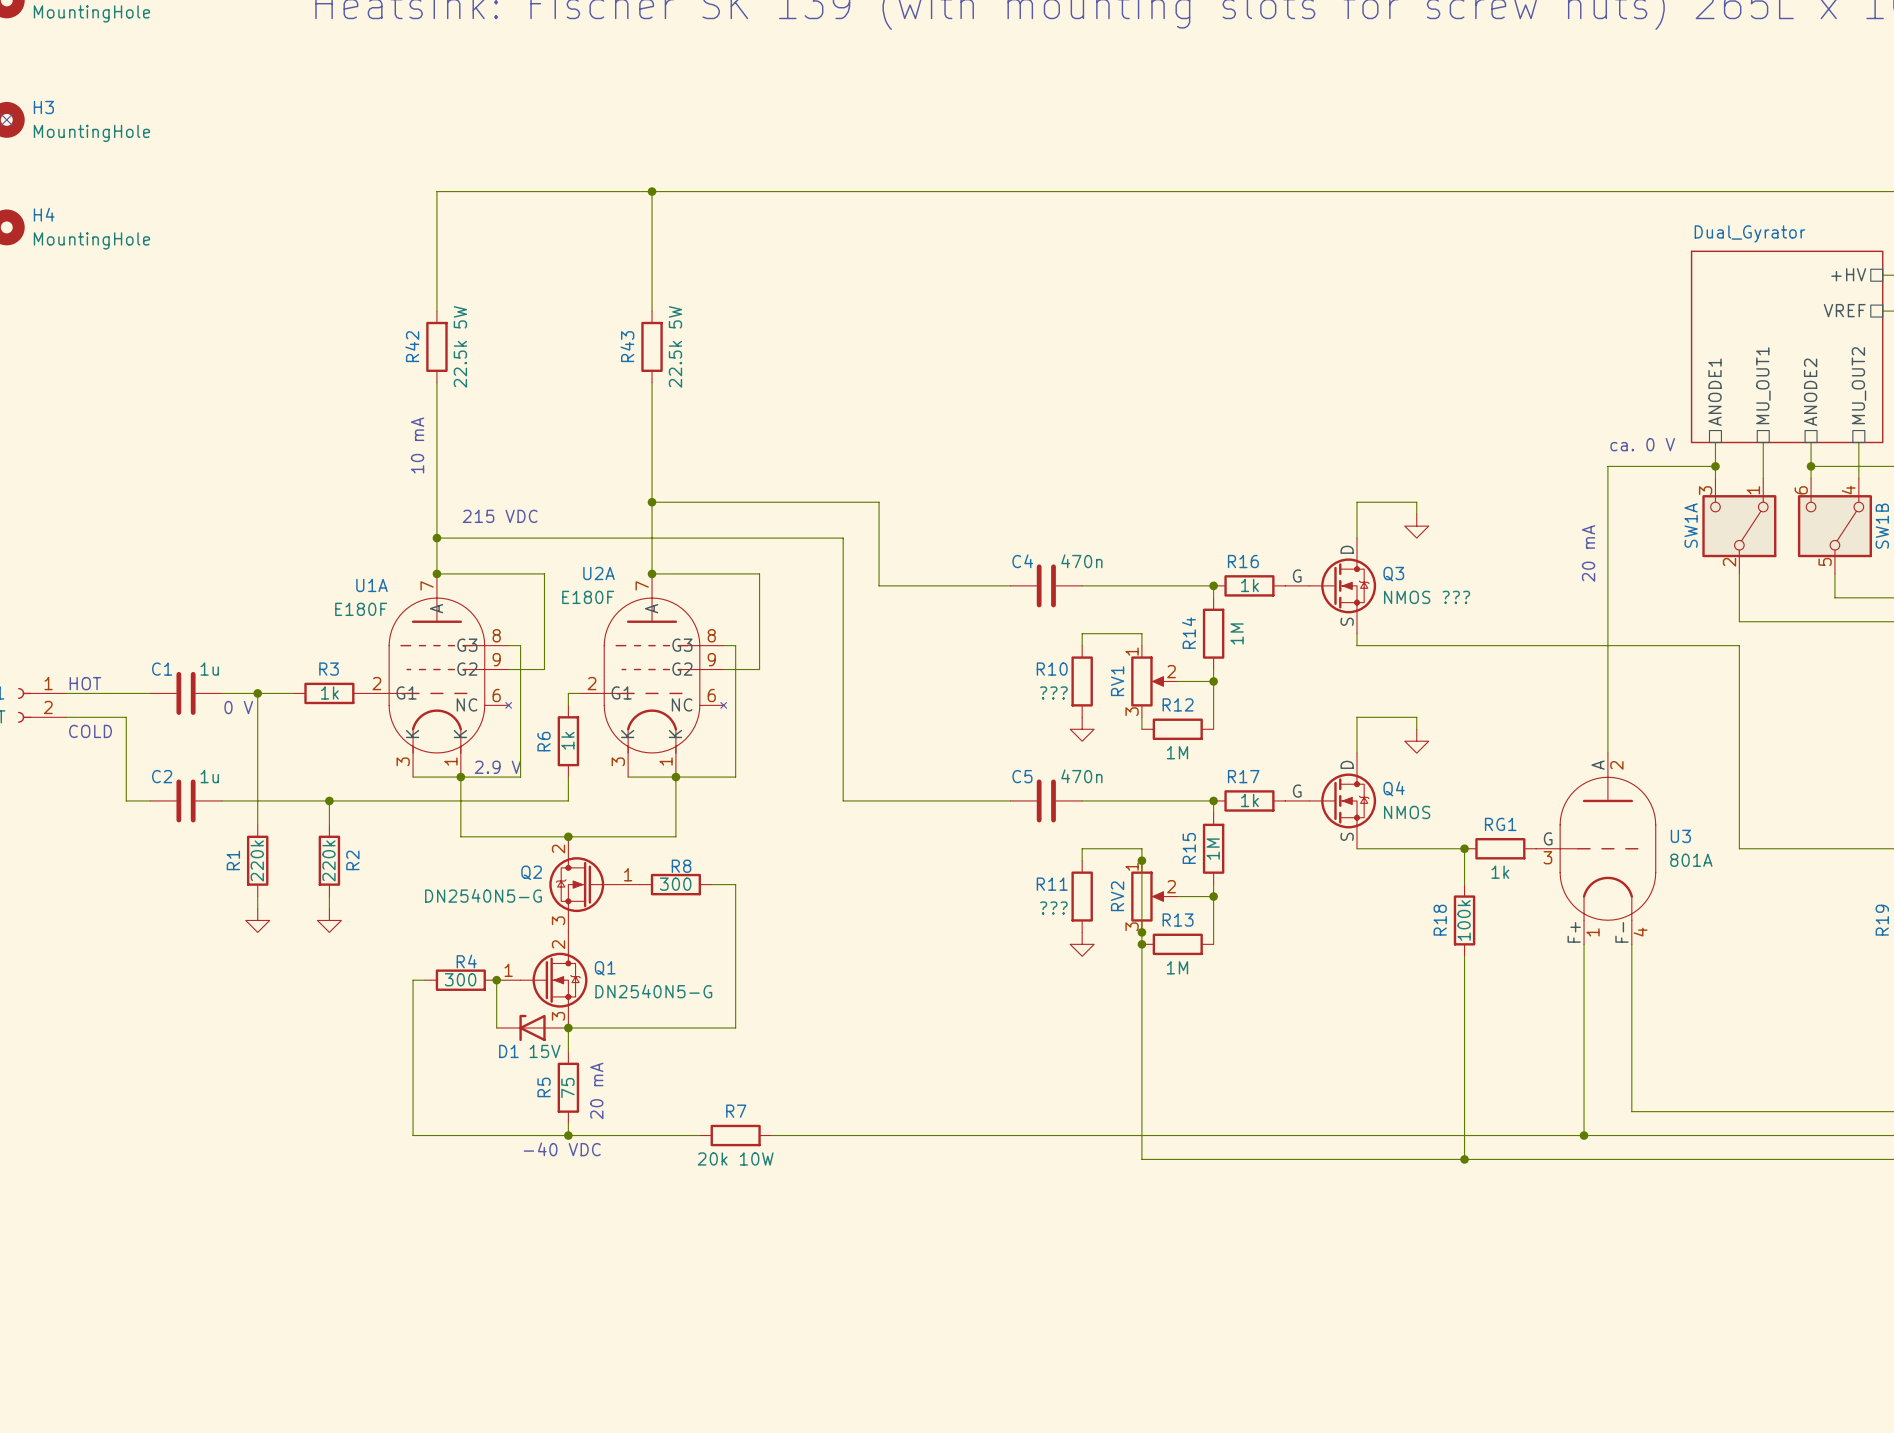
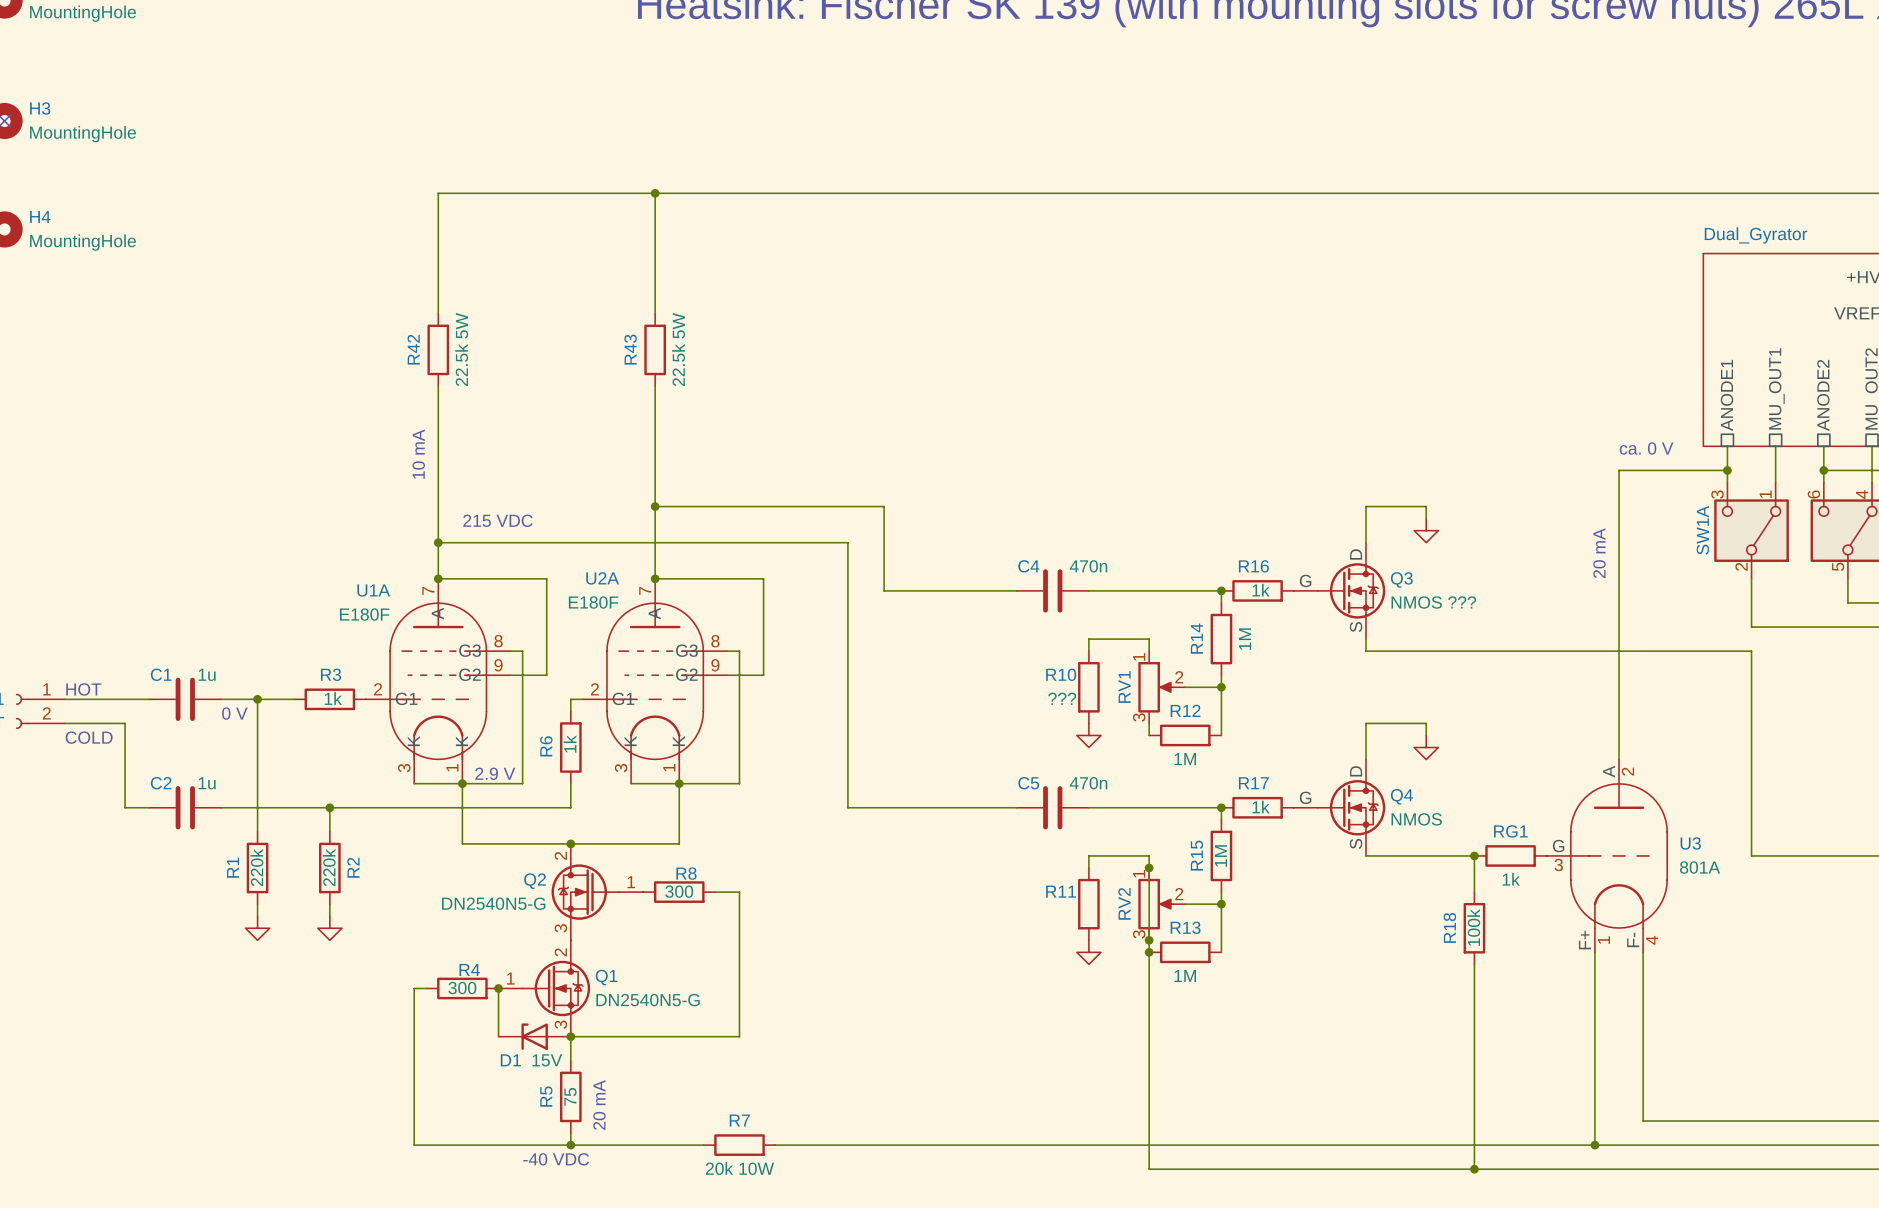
U1A symbol: [365, 573, 512, 778] -> [366, 578, 511, 784]
U2A symbol: [580, 573, 727, 778] -> [582, 578, 728, 784]
R11 value: ??? (1053, 908) -> none

